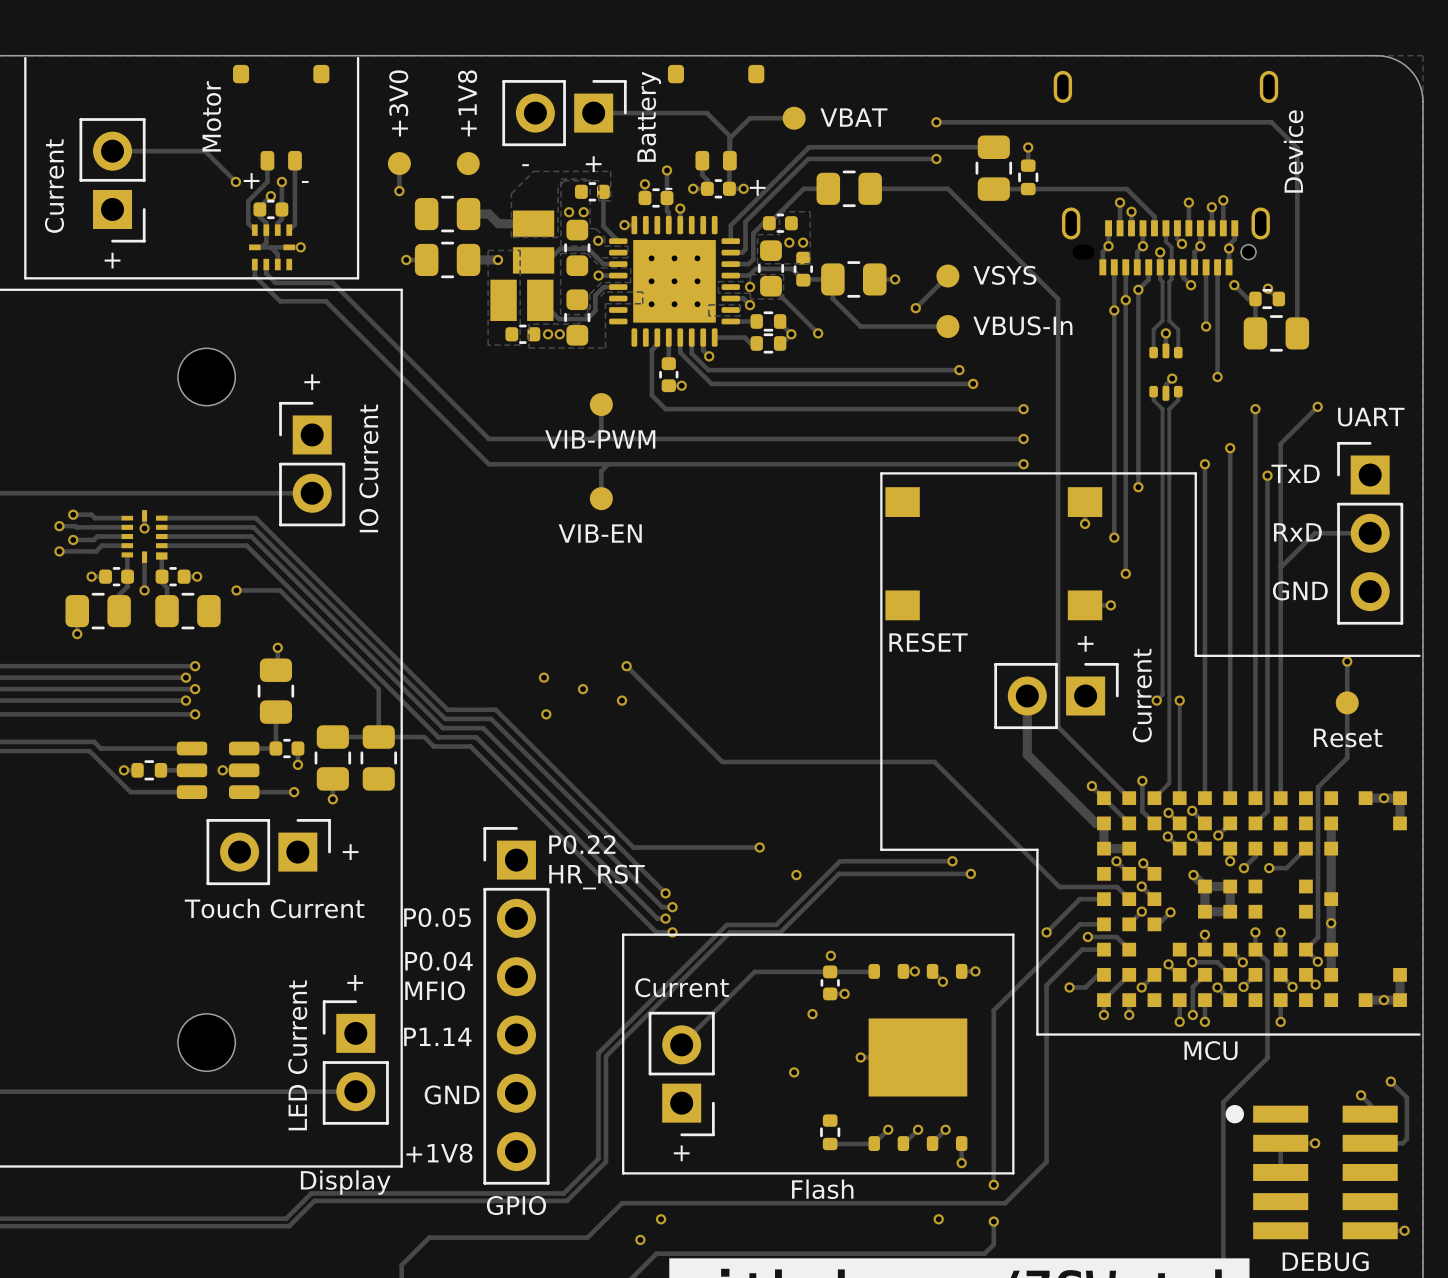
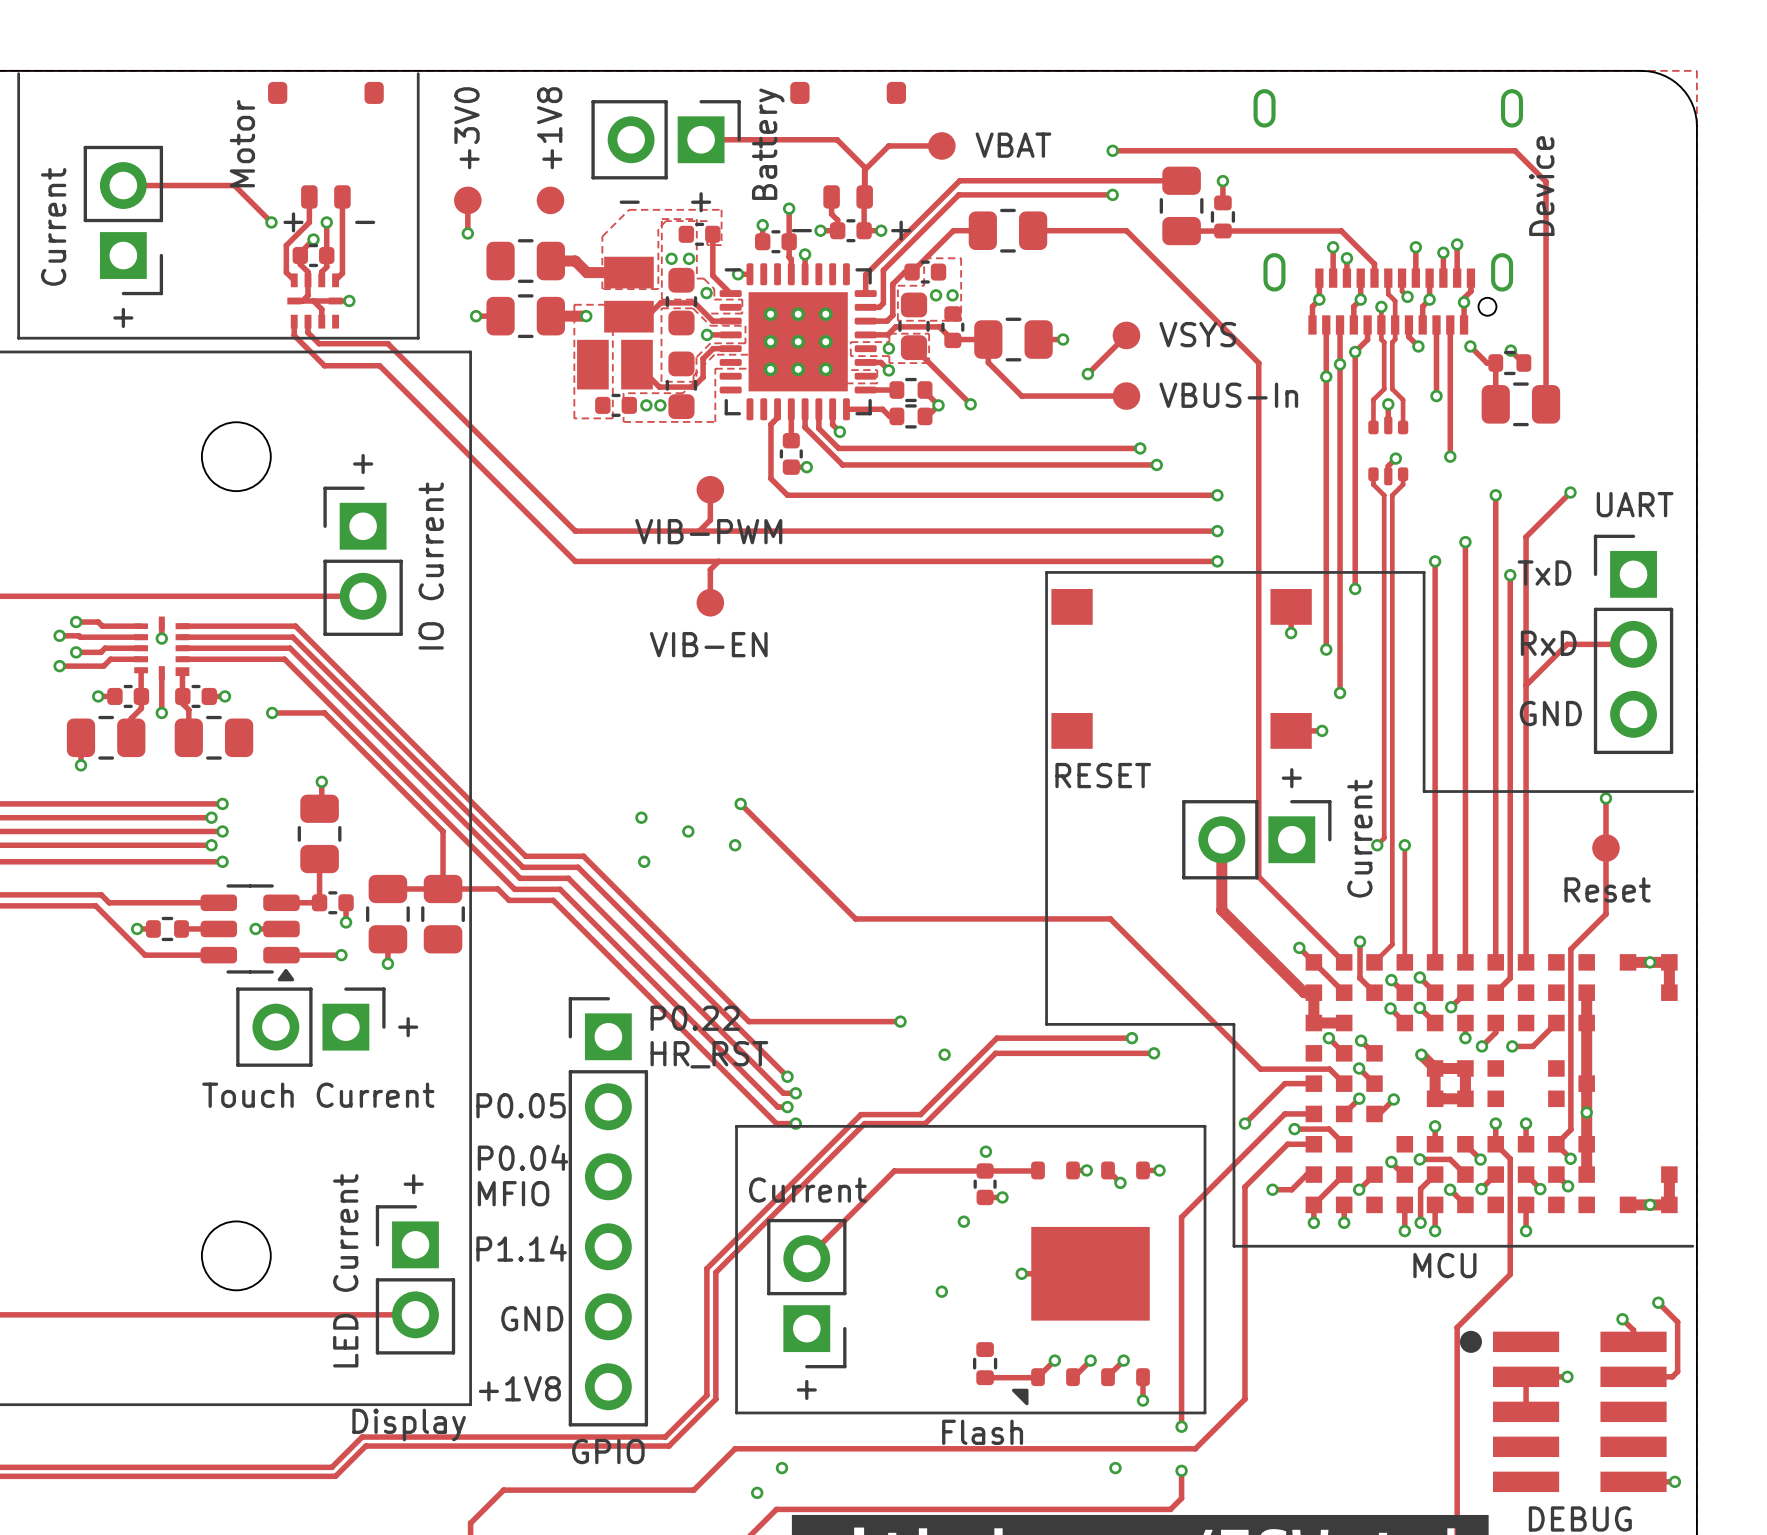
part footprint: [609, 215, 740, 347] -> [719, 263, 877, 421]
part footprint: [176, 741, 260, 800] -> [200, 884, 300, 982]
part footprint: [868, 963, 968, 1152] -> [1011, 1161, 1150, 1406]

